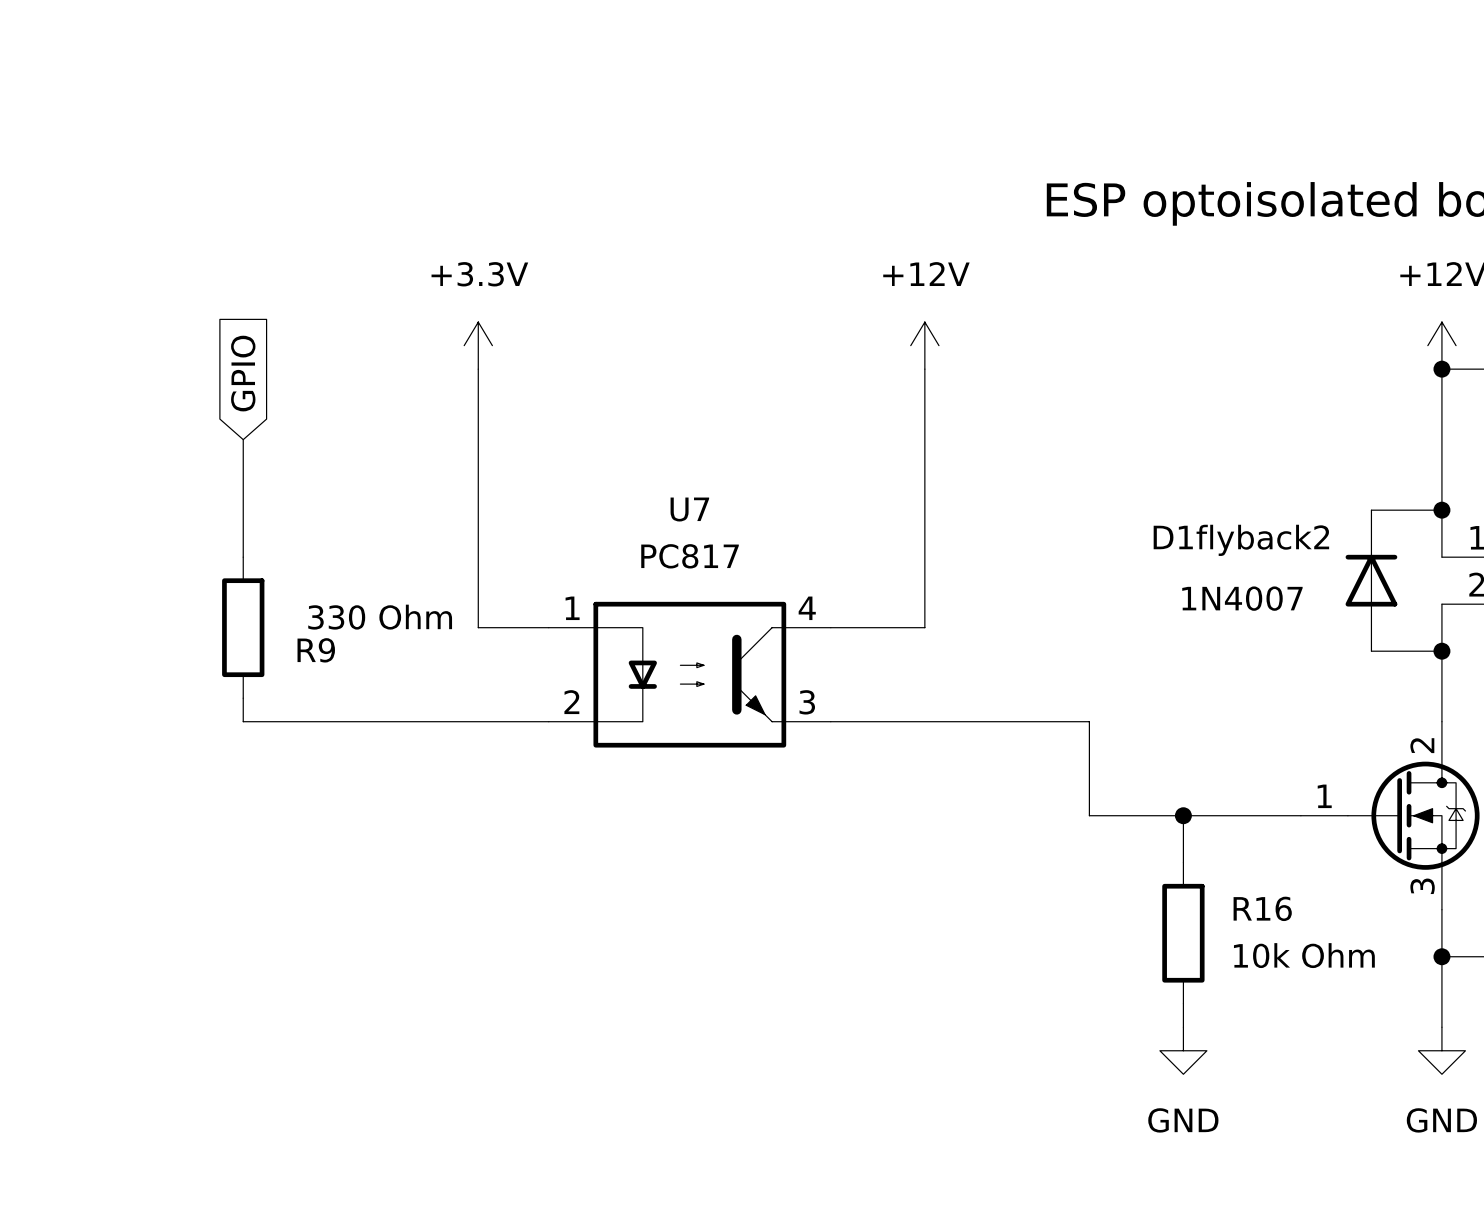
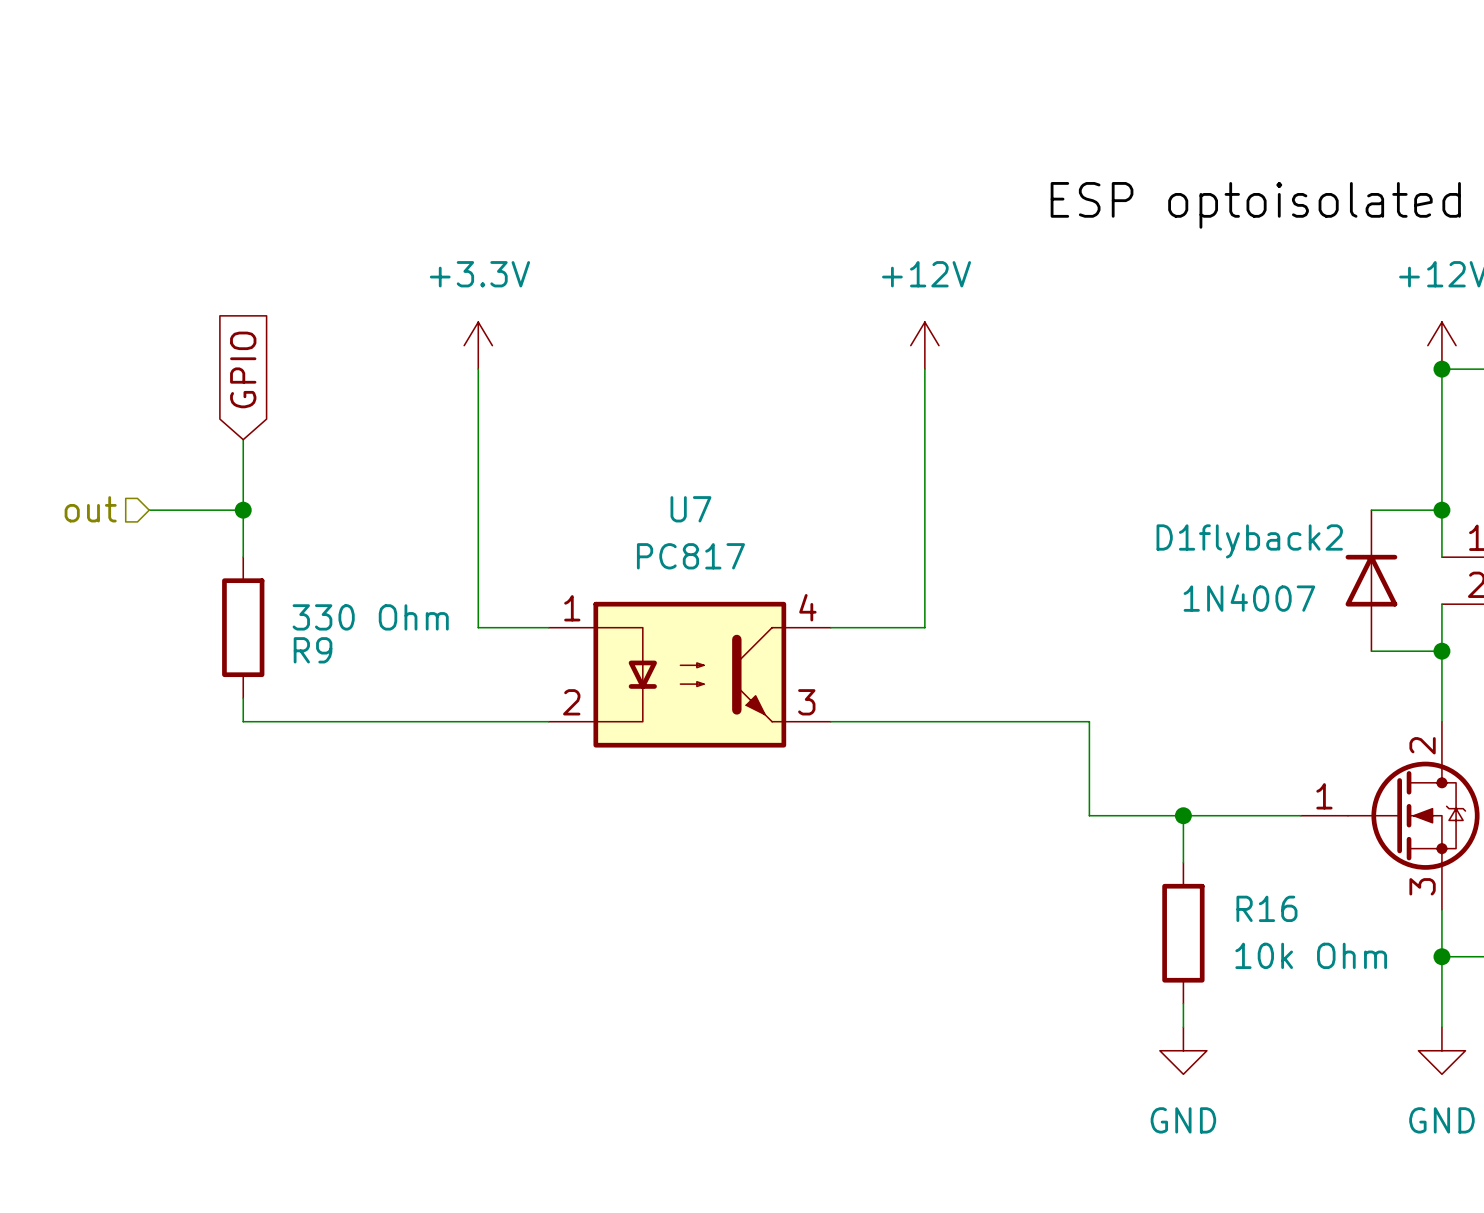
hierarchical label: none -> out (90, 509)
wire: none -> (149, 510) (243, 510)
junction: none -> (243, 510)

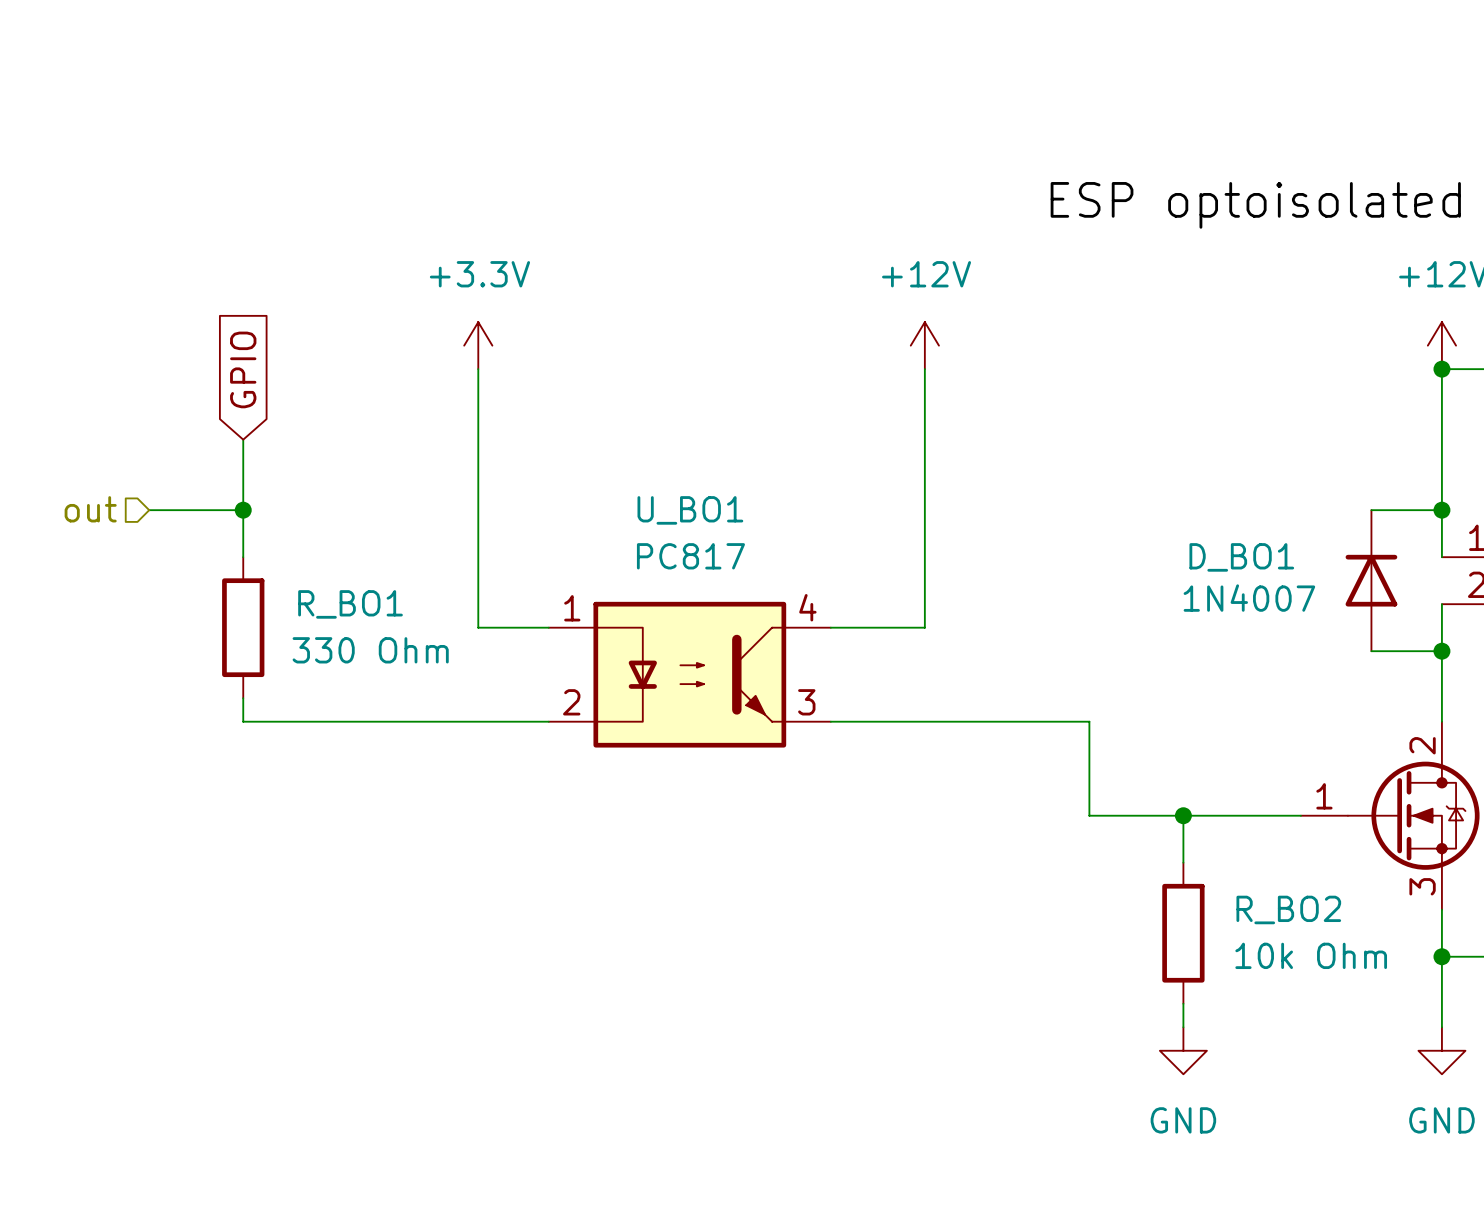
U7 name: U7 (690, 509) -> U_BO1 (690, 510)
D1flyback2 name: D1flyback2 (1249, 541) -> D_BO1 (1241, 557)
R9 value position: 330 Ohm (370, 617) -> 330 Ohm (370, 650)
R9 name: R9 (313, 650) -> R_BO1 (350, 604)
R16 name: R16 (1266, 908) -> R_BO2 (1288, 909)

